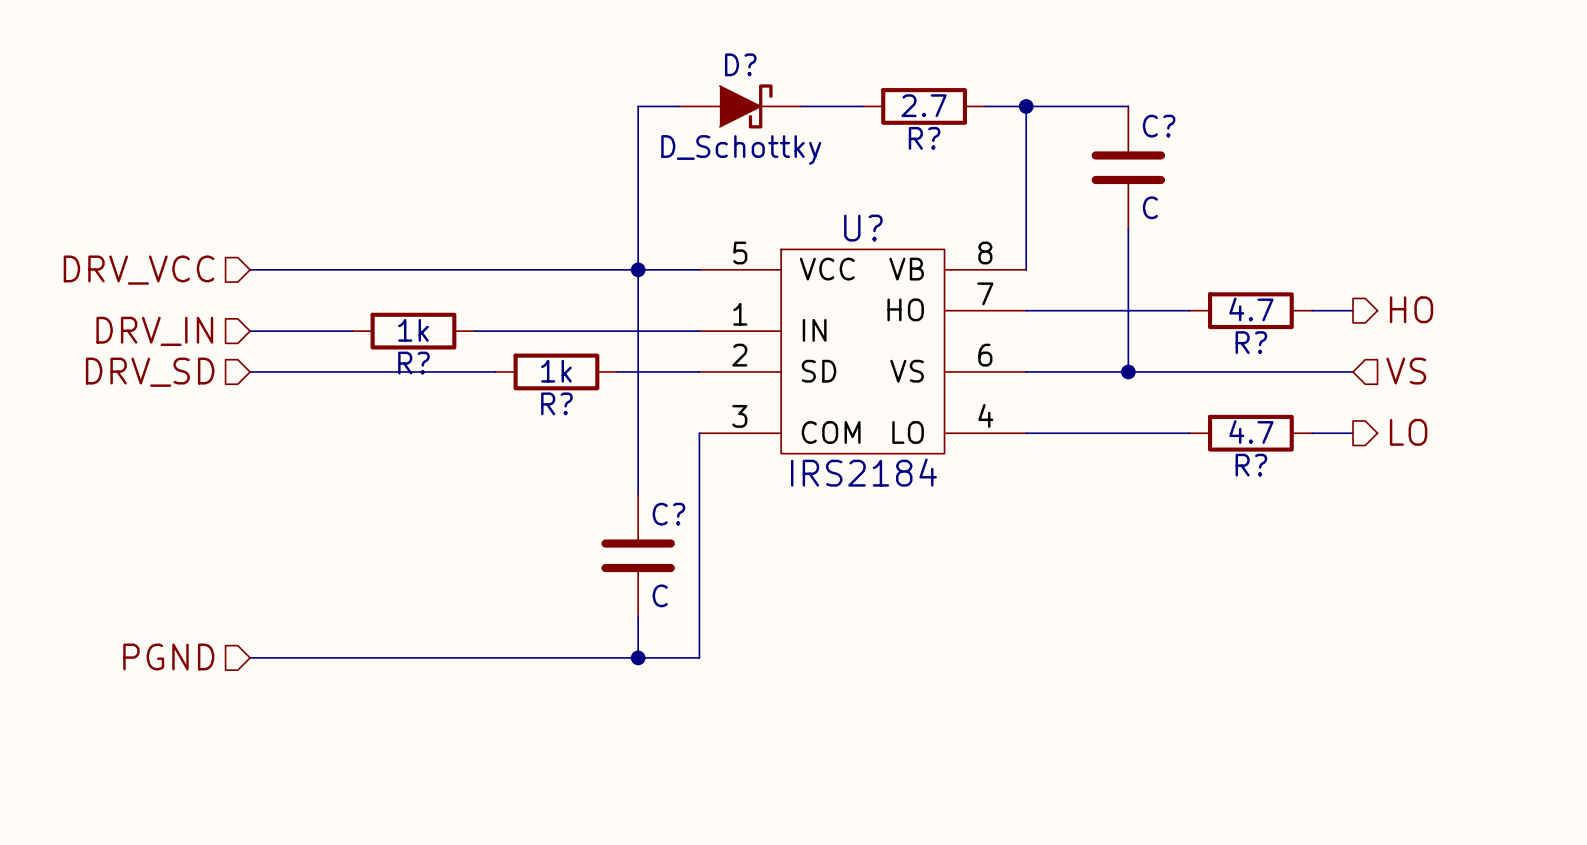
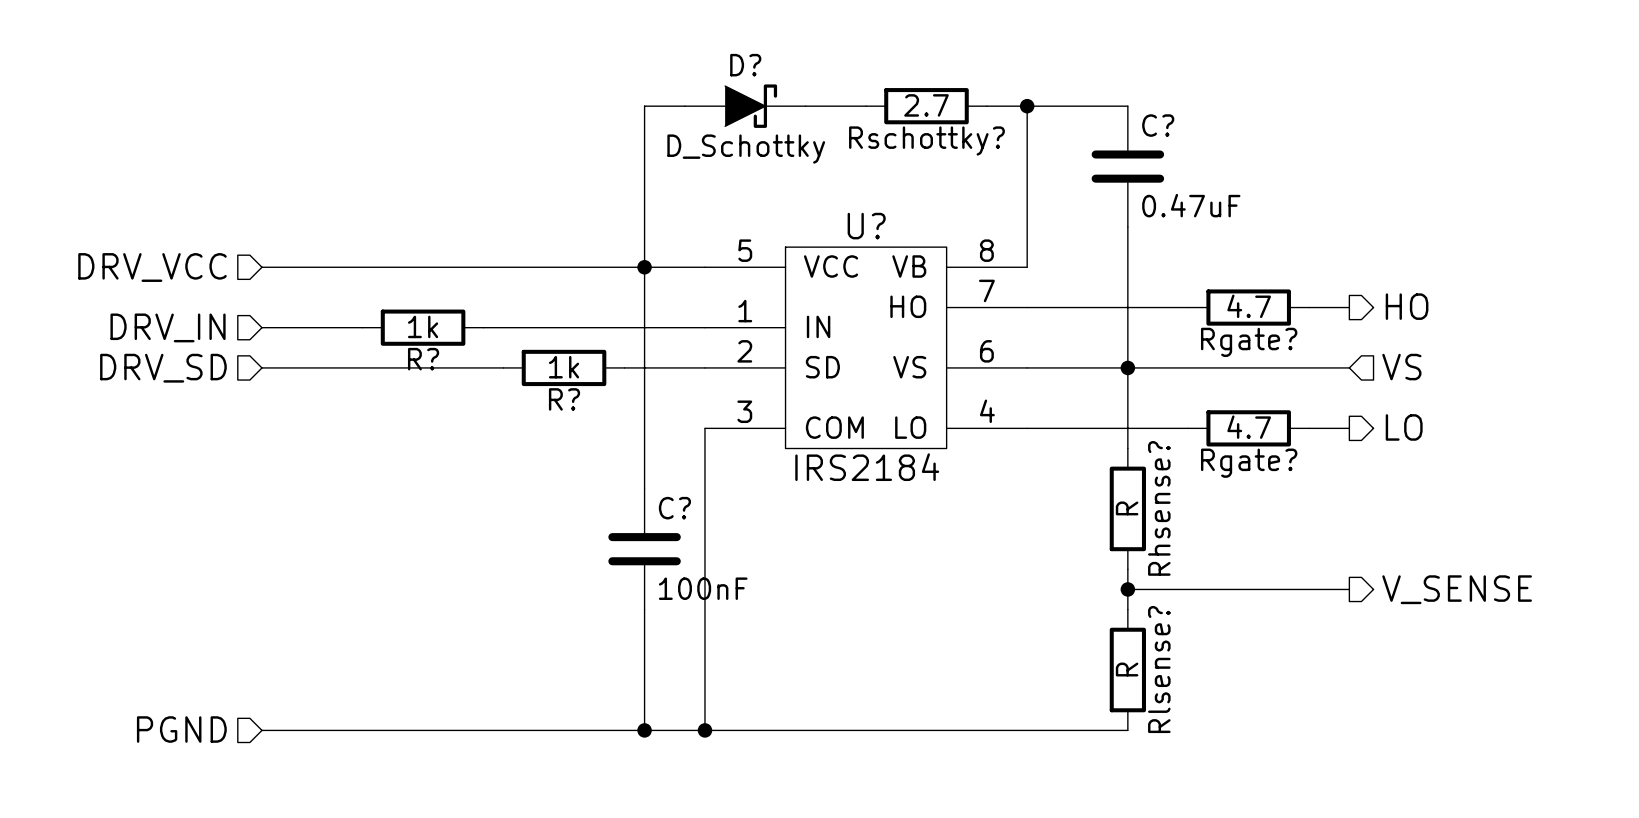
R? name: R? (924, 138) -> Rschottky? (926, 140)
C? value: C (1150, 207) -> 0.47uF (1191, 205)
R? name: R? (1251, 342) -> Rgate? (1249, 342)
wire: none -> (1127, 367) (1127, 448)
R? name: R? (1251, 465) -> Rgate? (1249, 463)
Rhsense?: none -> R (1127, 508)
wire: none -> (1127, 569) (1127, 609)
C? value: C (660, 595) -> 100nF (703, 588)
wire: none -> (1127, 589) (1349, 589)
junction: none -> (1127, 589)
hierarchical label: none -> V_SENSE (1457, 589)
hierarchical label position: PGND (168, 656) -> PGND (181, 729)
wire: (250, 657) (699, 657) -> (704, 730) (704, 649)
wire: none -> (644, 649) (644, 730)
junction: (638, 657) -> none
Rlsense?: none -> R (1127, 670)
wire: none -> (261, 730) (1127, 730)
junction: none -> (644, 730)
junction: none -> (704, 730)

